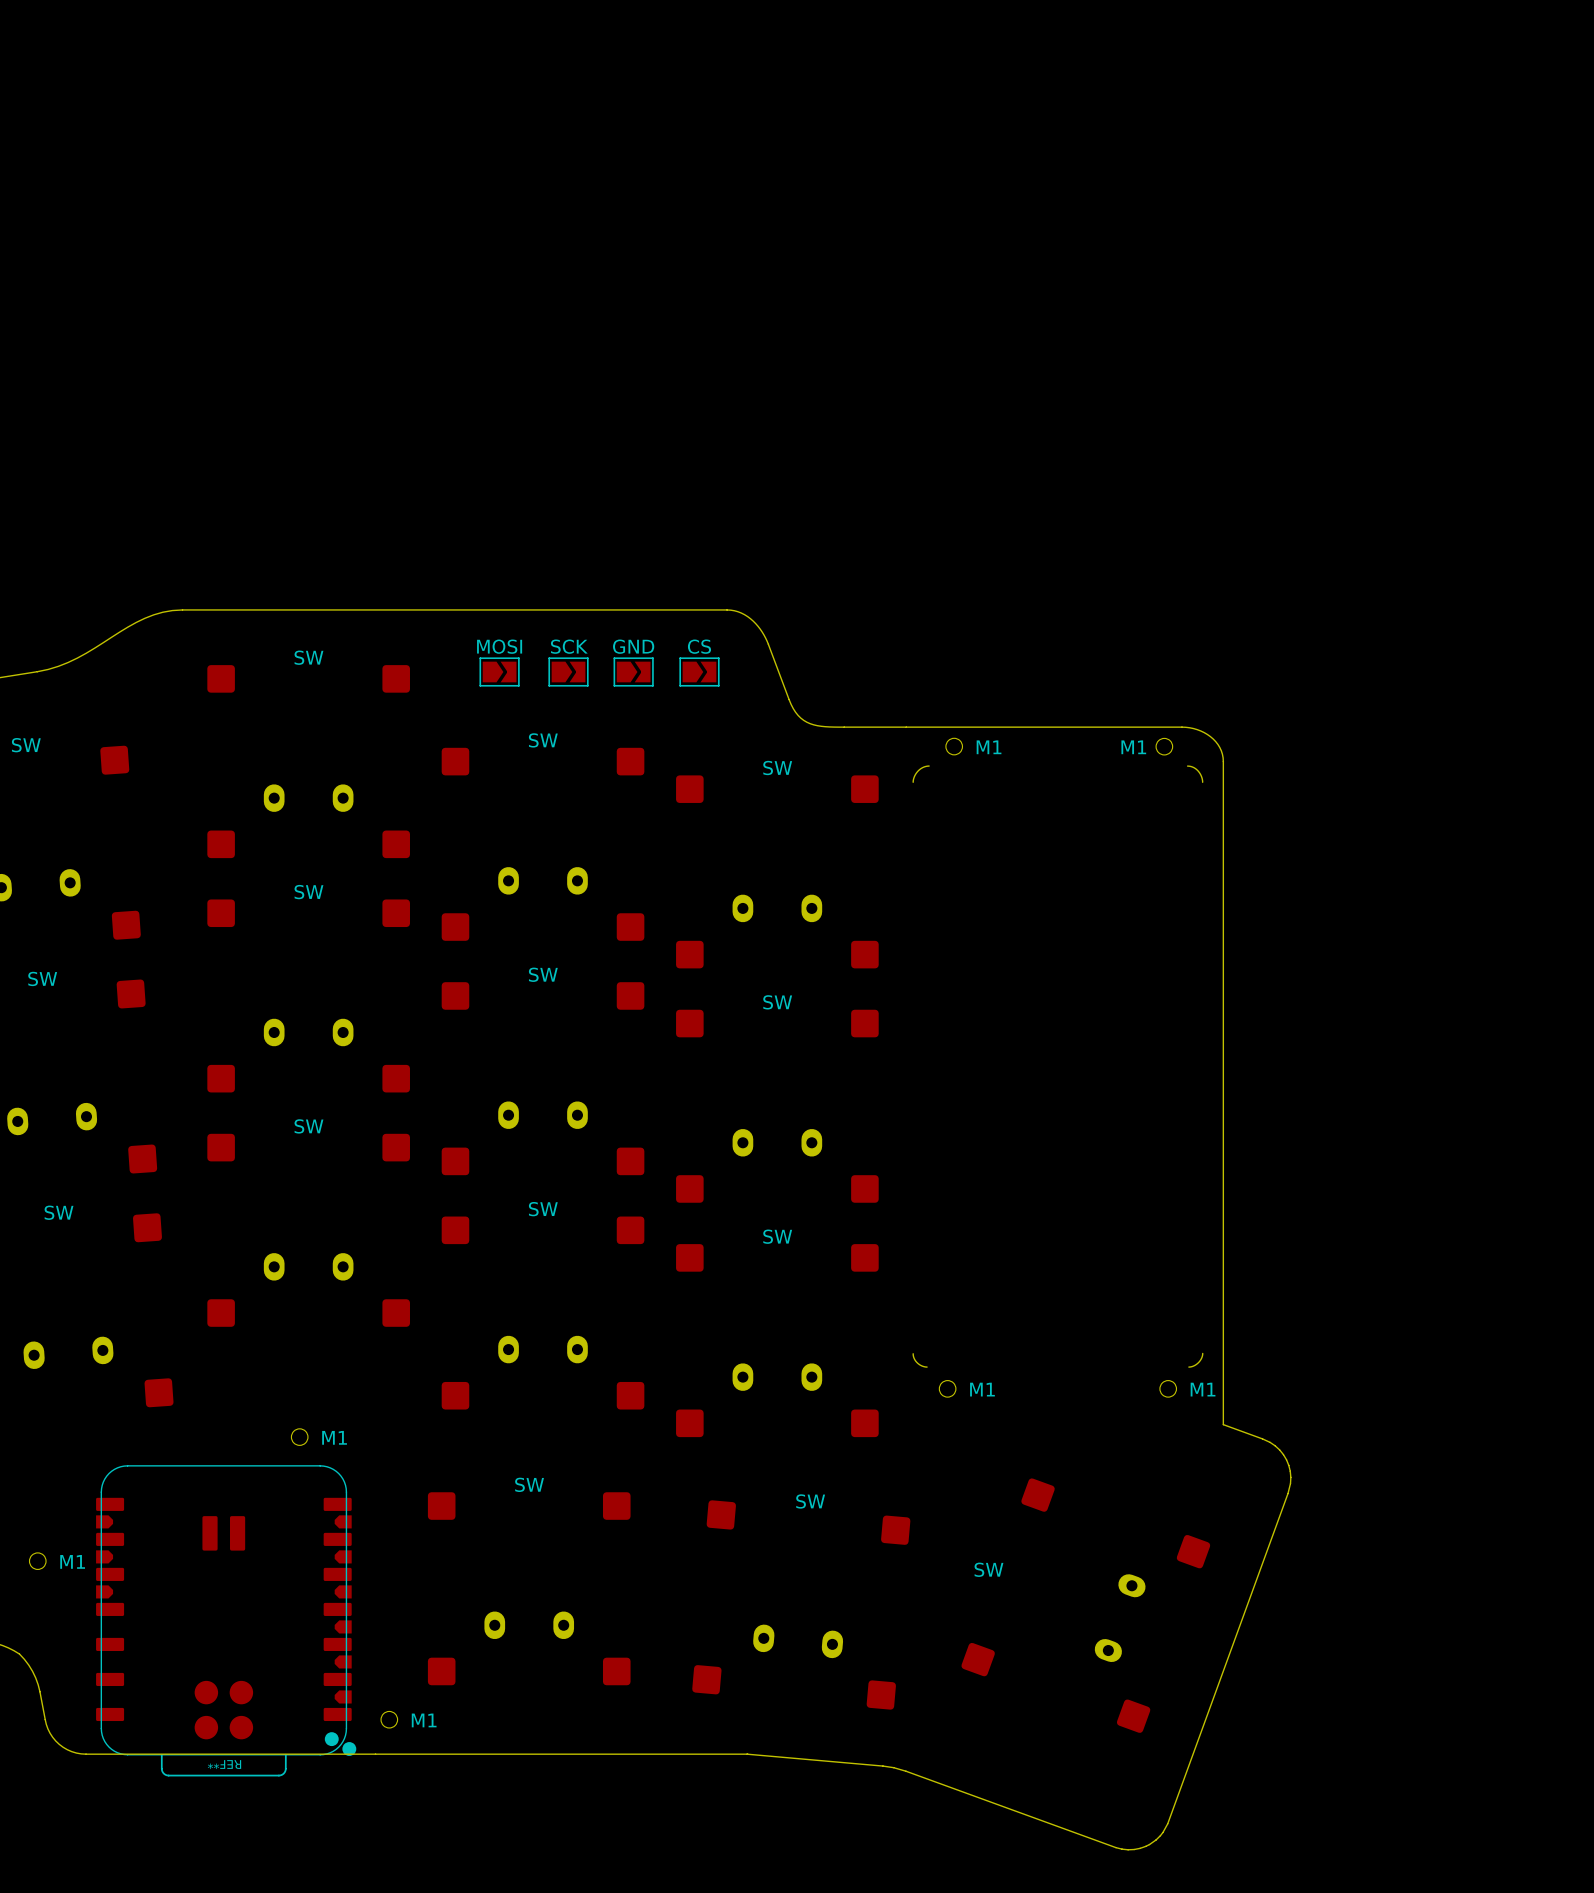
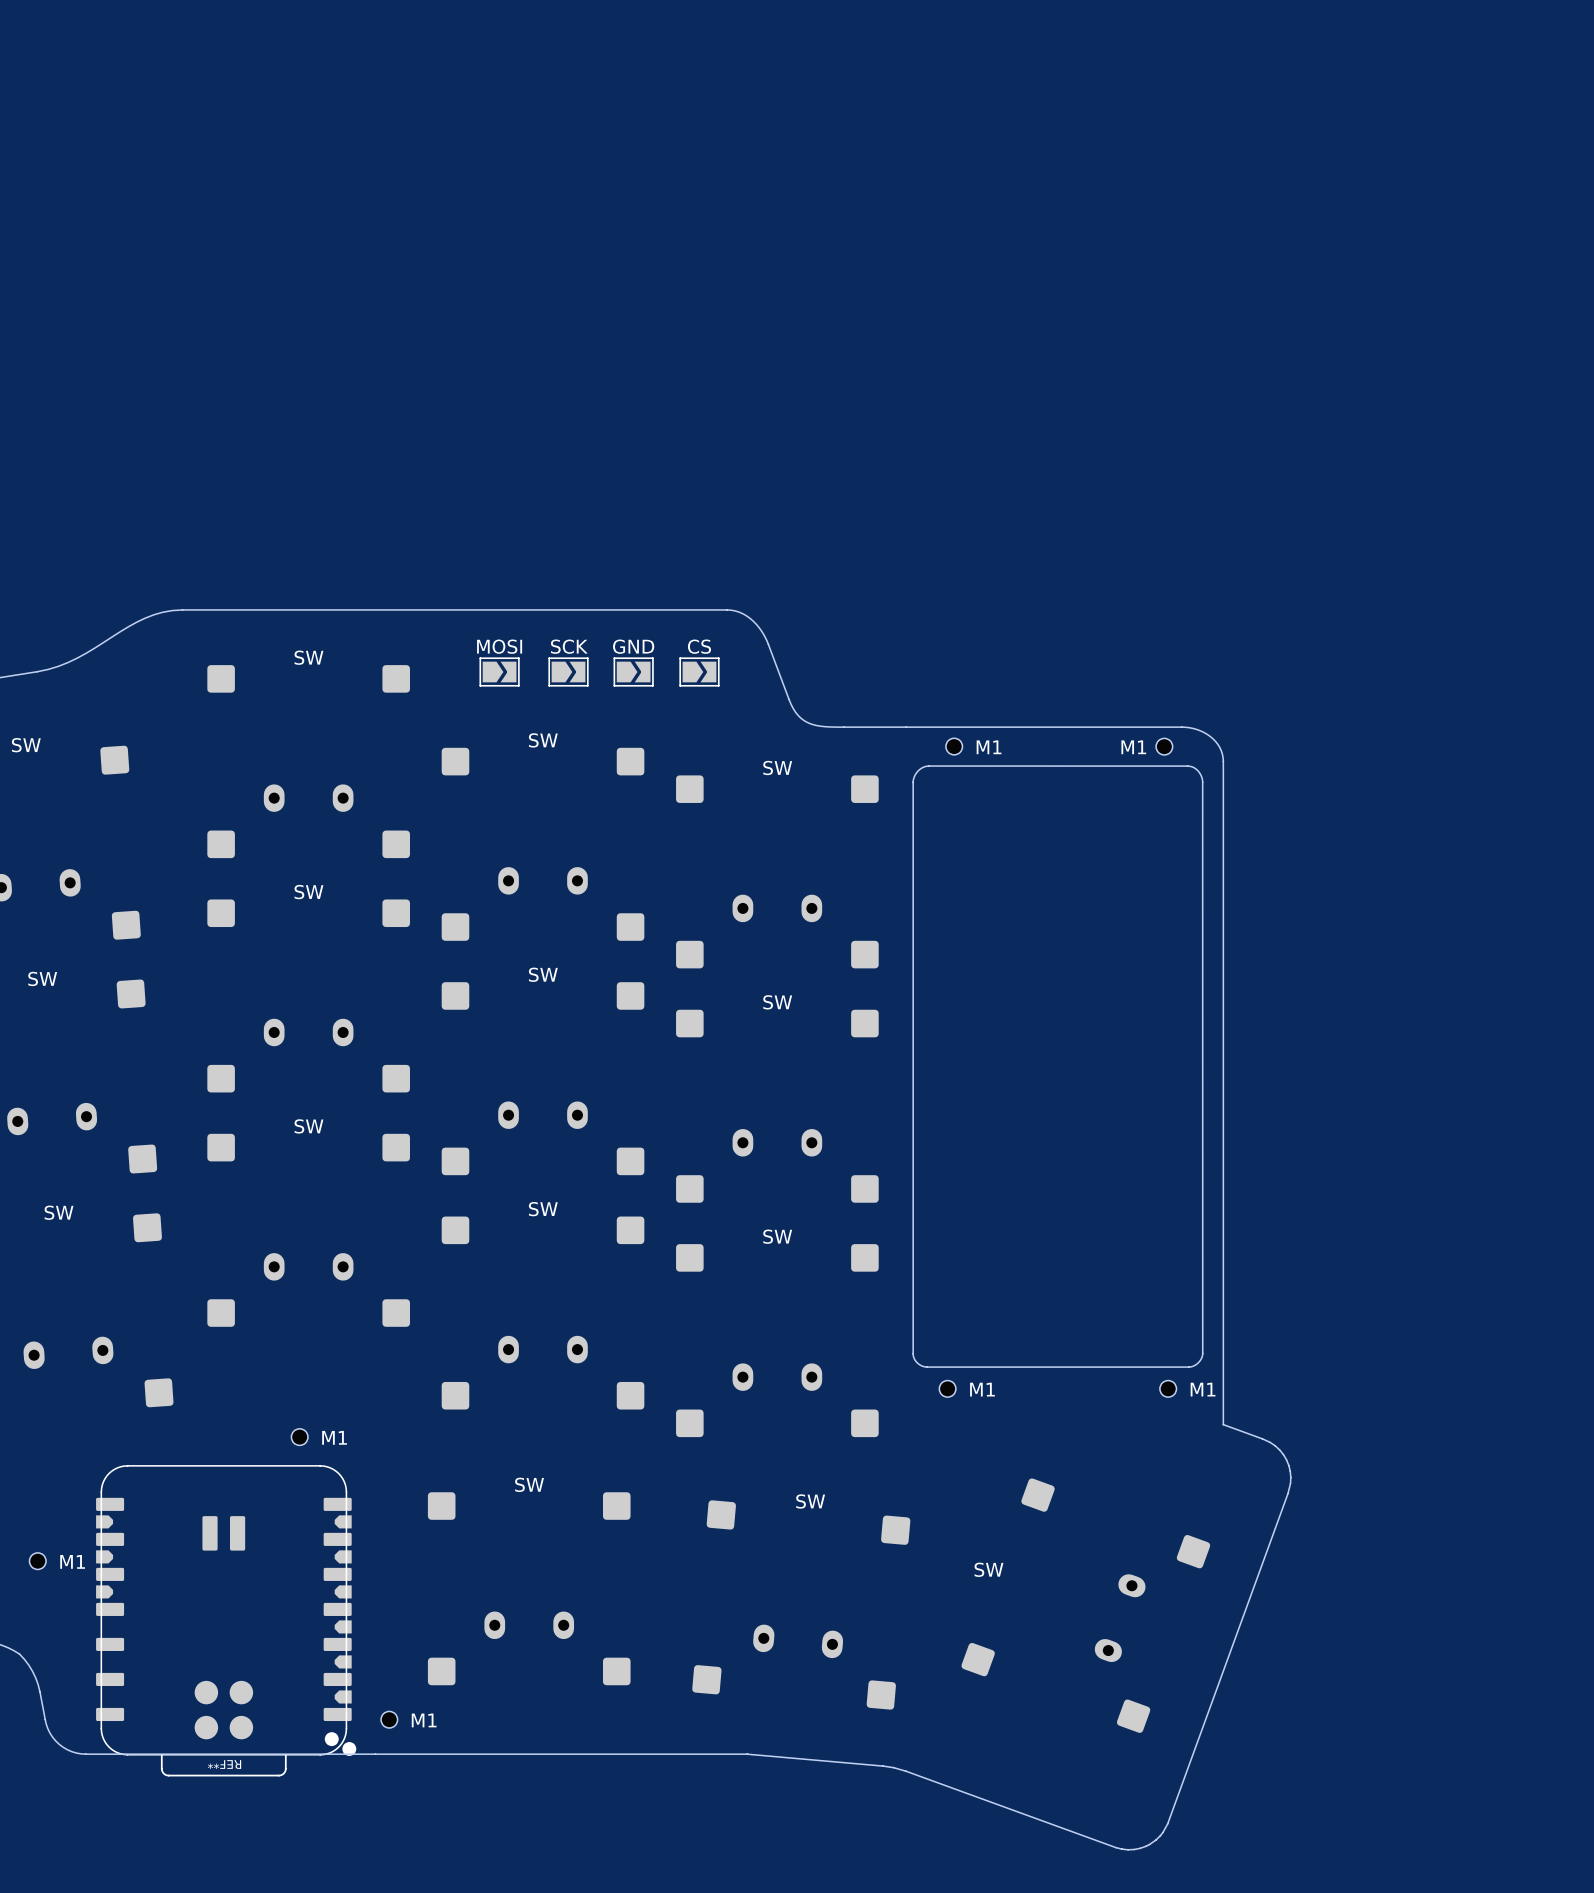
board edge: none -> (929, 766) (1187, 766)
board edge: none -> (913, 782) (913, 1353)
board edge: none -> (1202, 782) (1202, 1353)
board edge: none -> (927, 1367) (1188, 1367)

